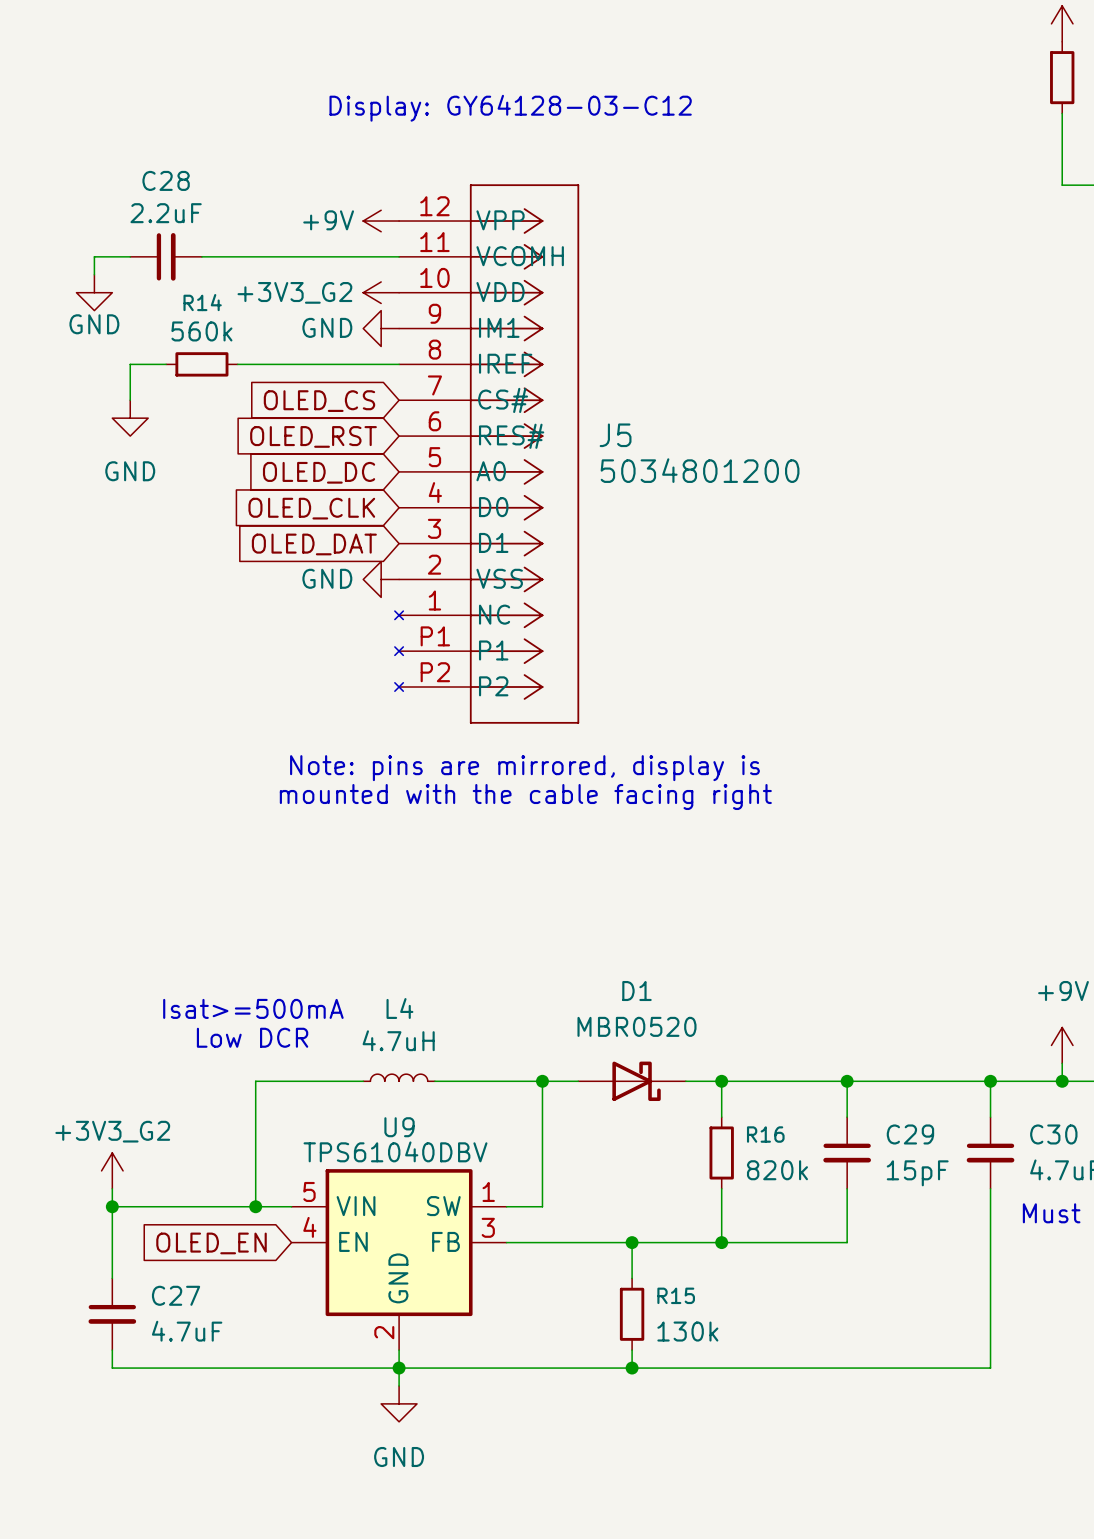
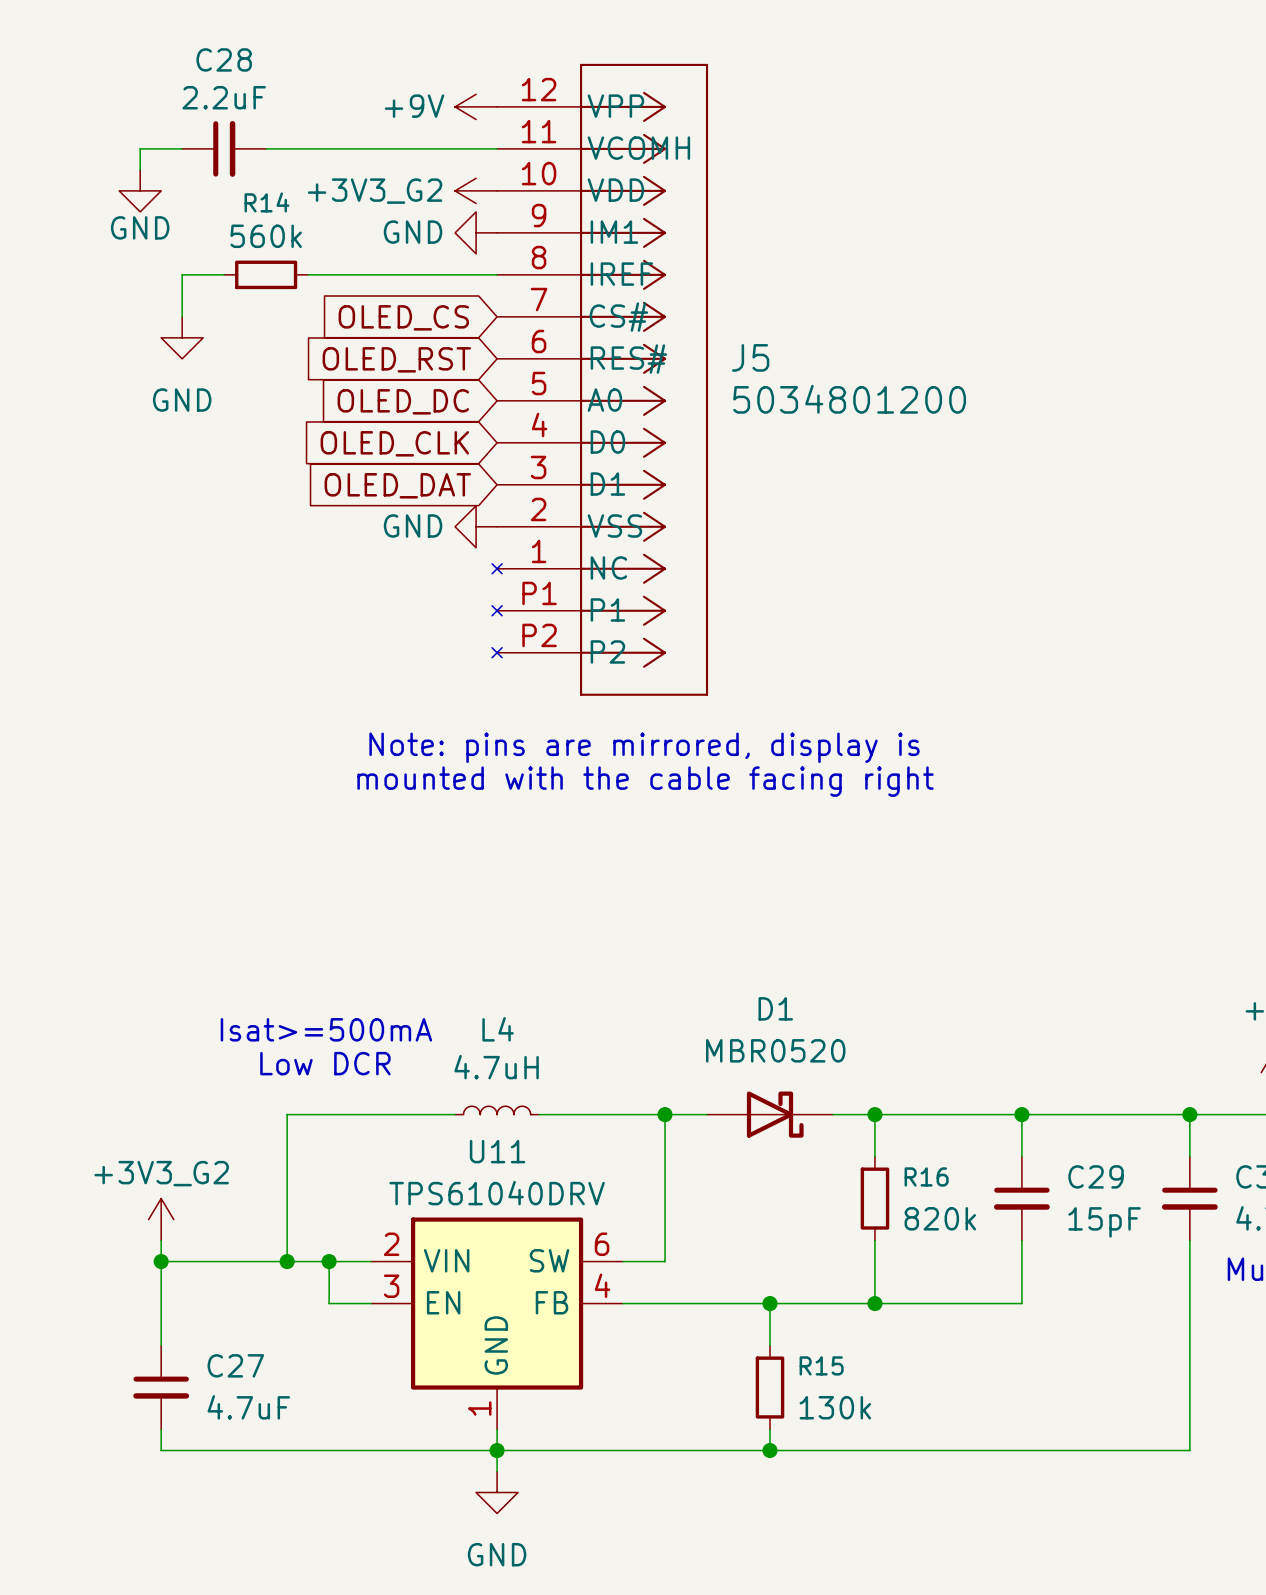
wire: (255, 1081) (255, 1206) -> (329, 1114) (287, 1114) (287, 1261)
U9 name: U9 (399, 1127) -> U11 (497, 1151)
U9 value: TPS61040DBV (395, 1151) -> TPS61040DRV (497, 1193)
U9 pin number: 5 (309, 1191) -> 2 (391, 1244)
U9 pin number: 1 (488, 1191) -> 6 (602, 1244)
junction: none -> (287, 1261)
wire: none -> (329, 1261) (329, 1303) (371, 1303)
U9 pin number: 4 (309, 1227) -> 3 (391, 1286)
U9 pin number: 3 (488, 1227) -> 4 (602, 1285)
global label: OLED_EN (211, 1243) -> none
U9 pin number: 2 (384, 1332) -> 1 (479, 1408)

